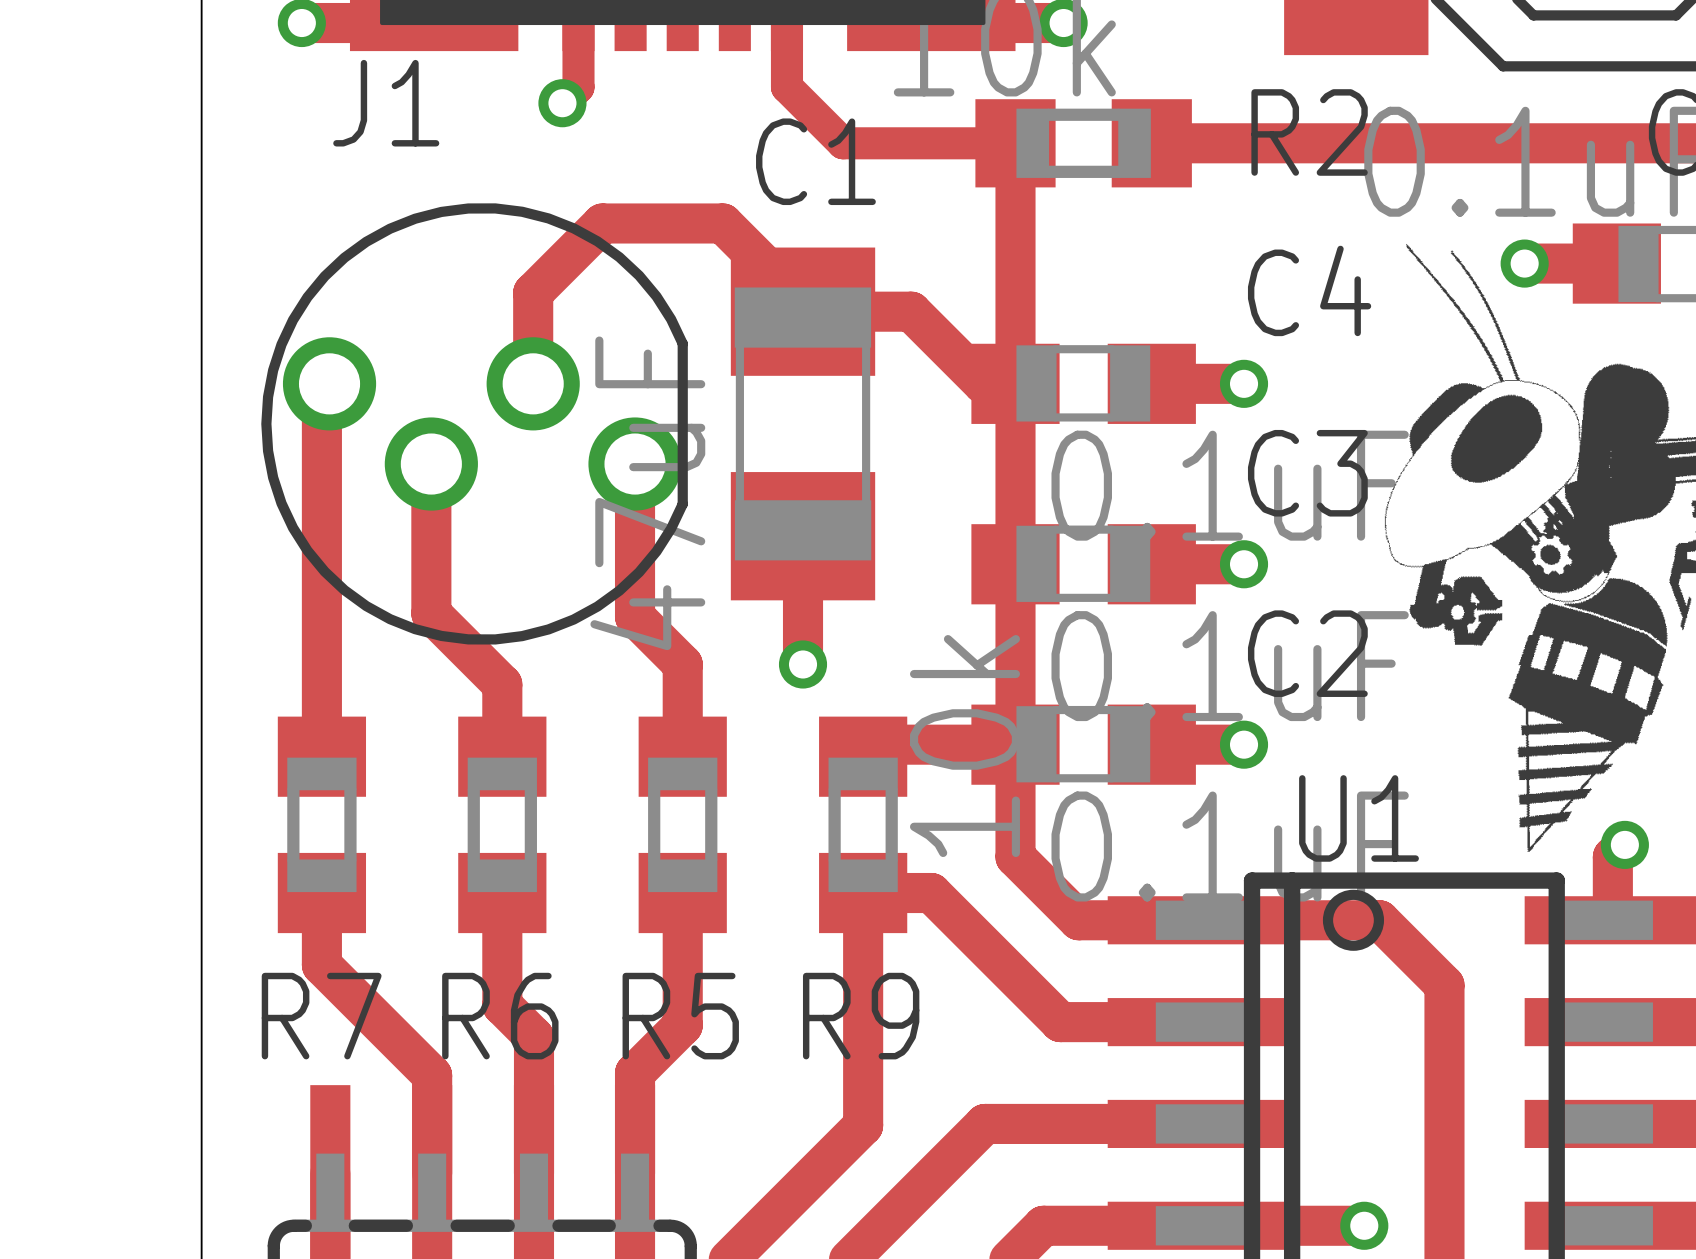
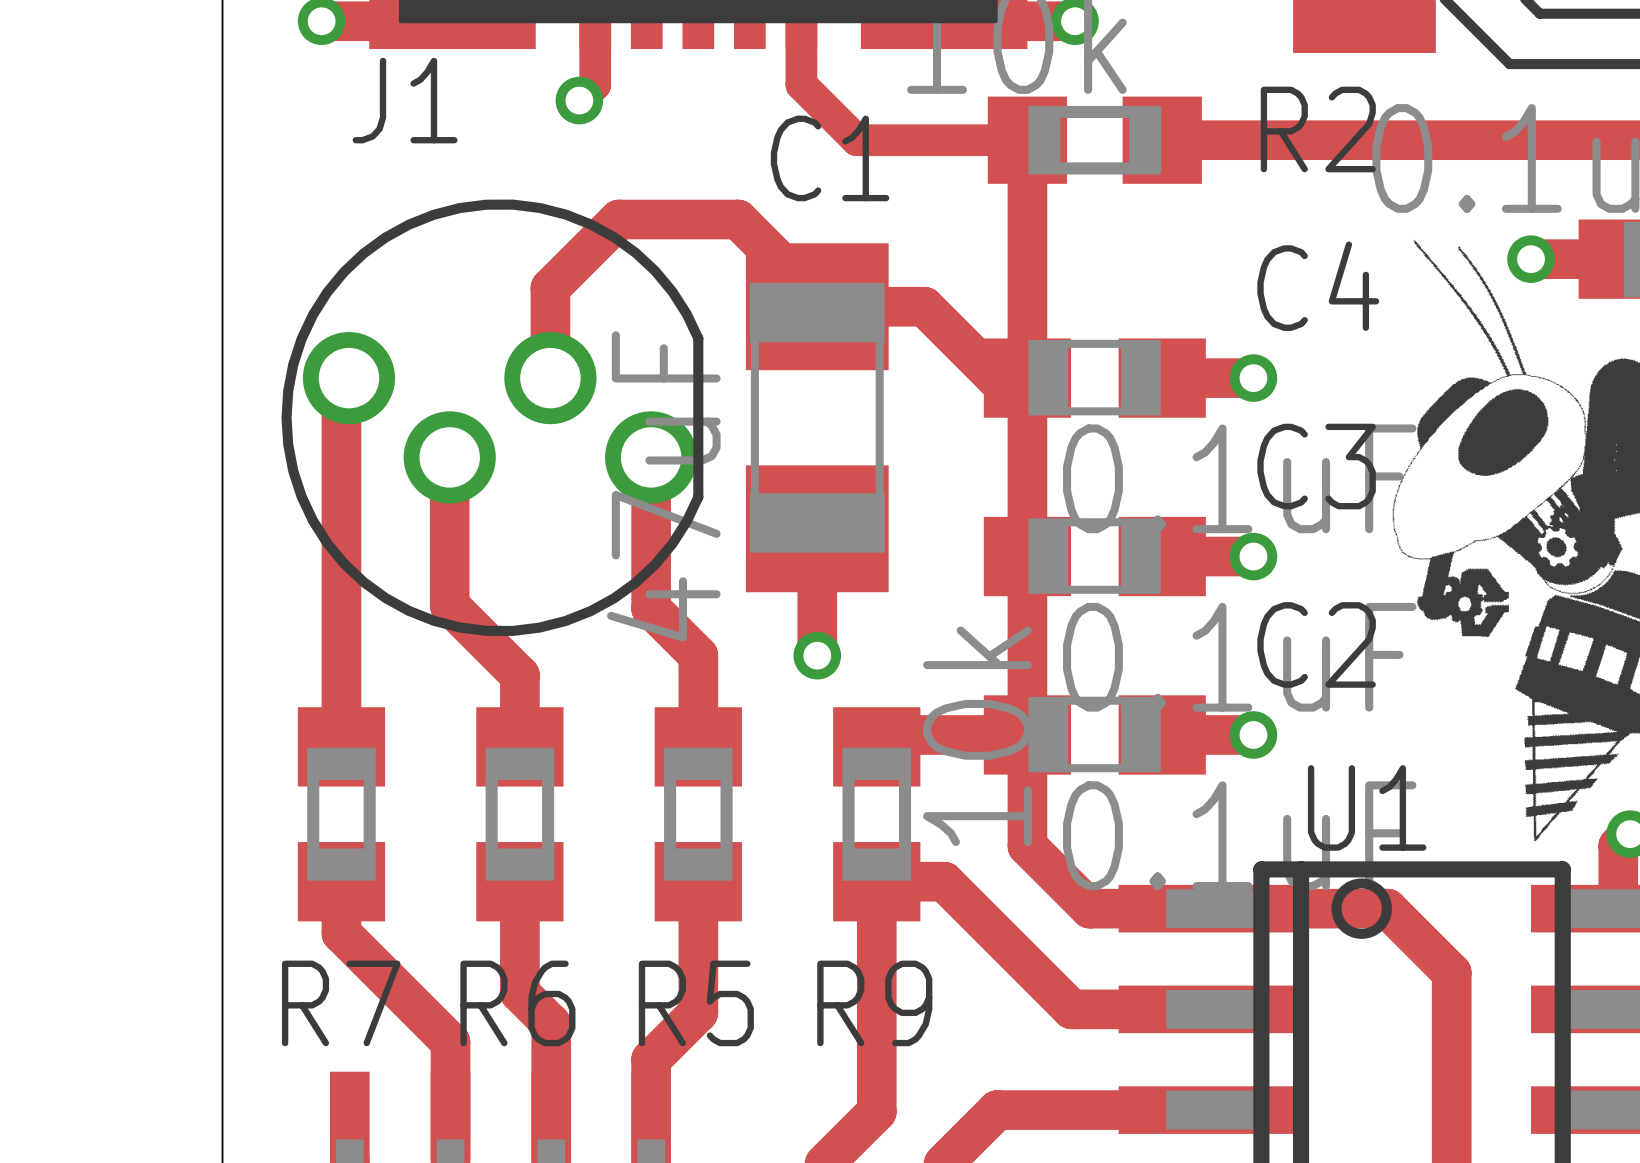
track: (321, 945) (321, 965) (432, 1075) -> (341, 933) (450, 1042) (450, 1062)

